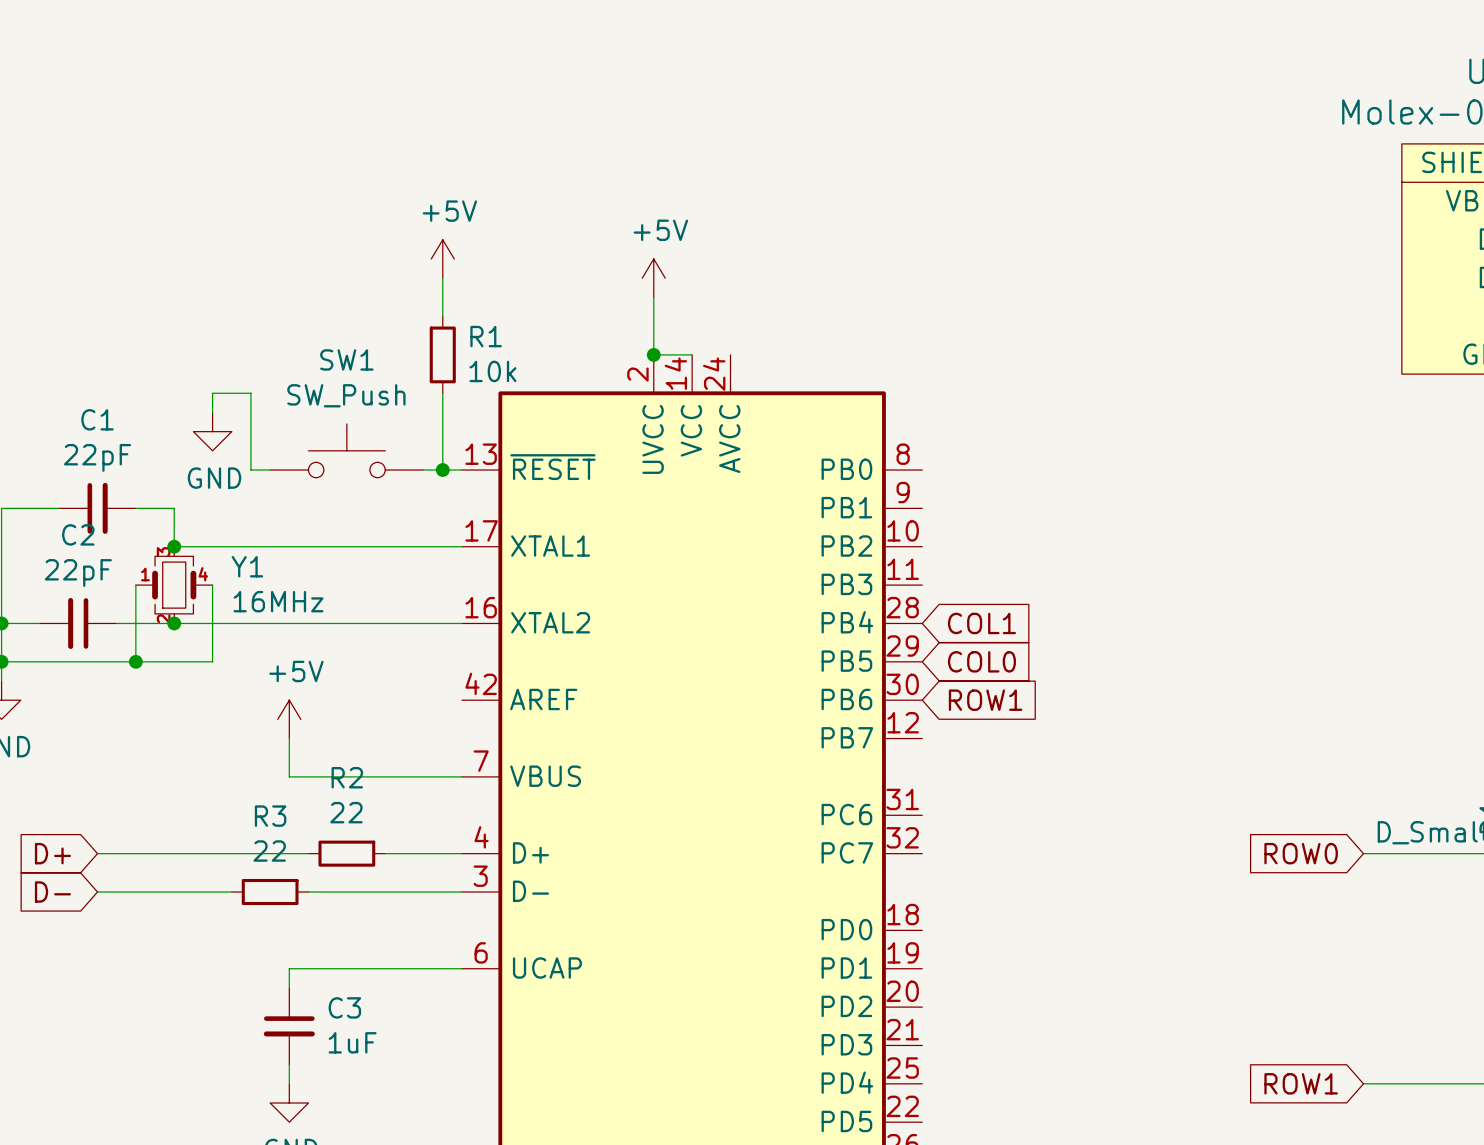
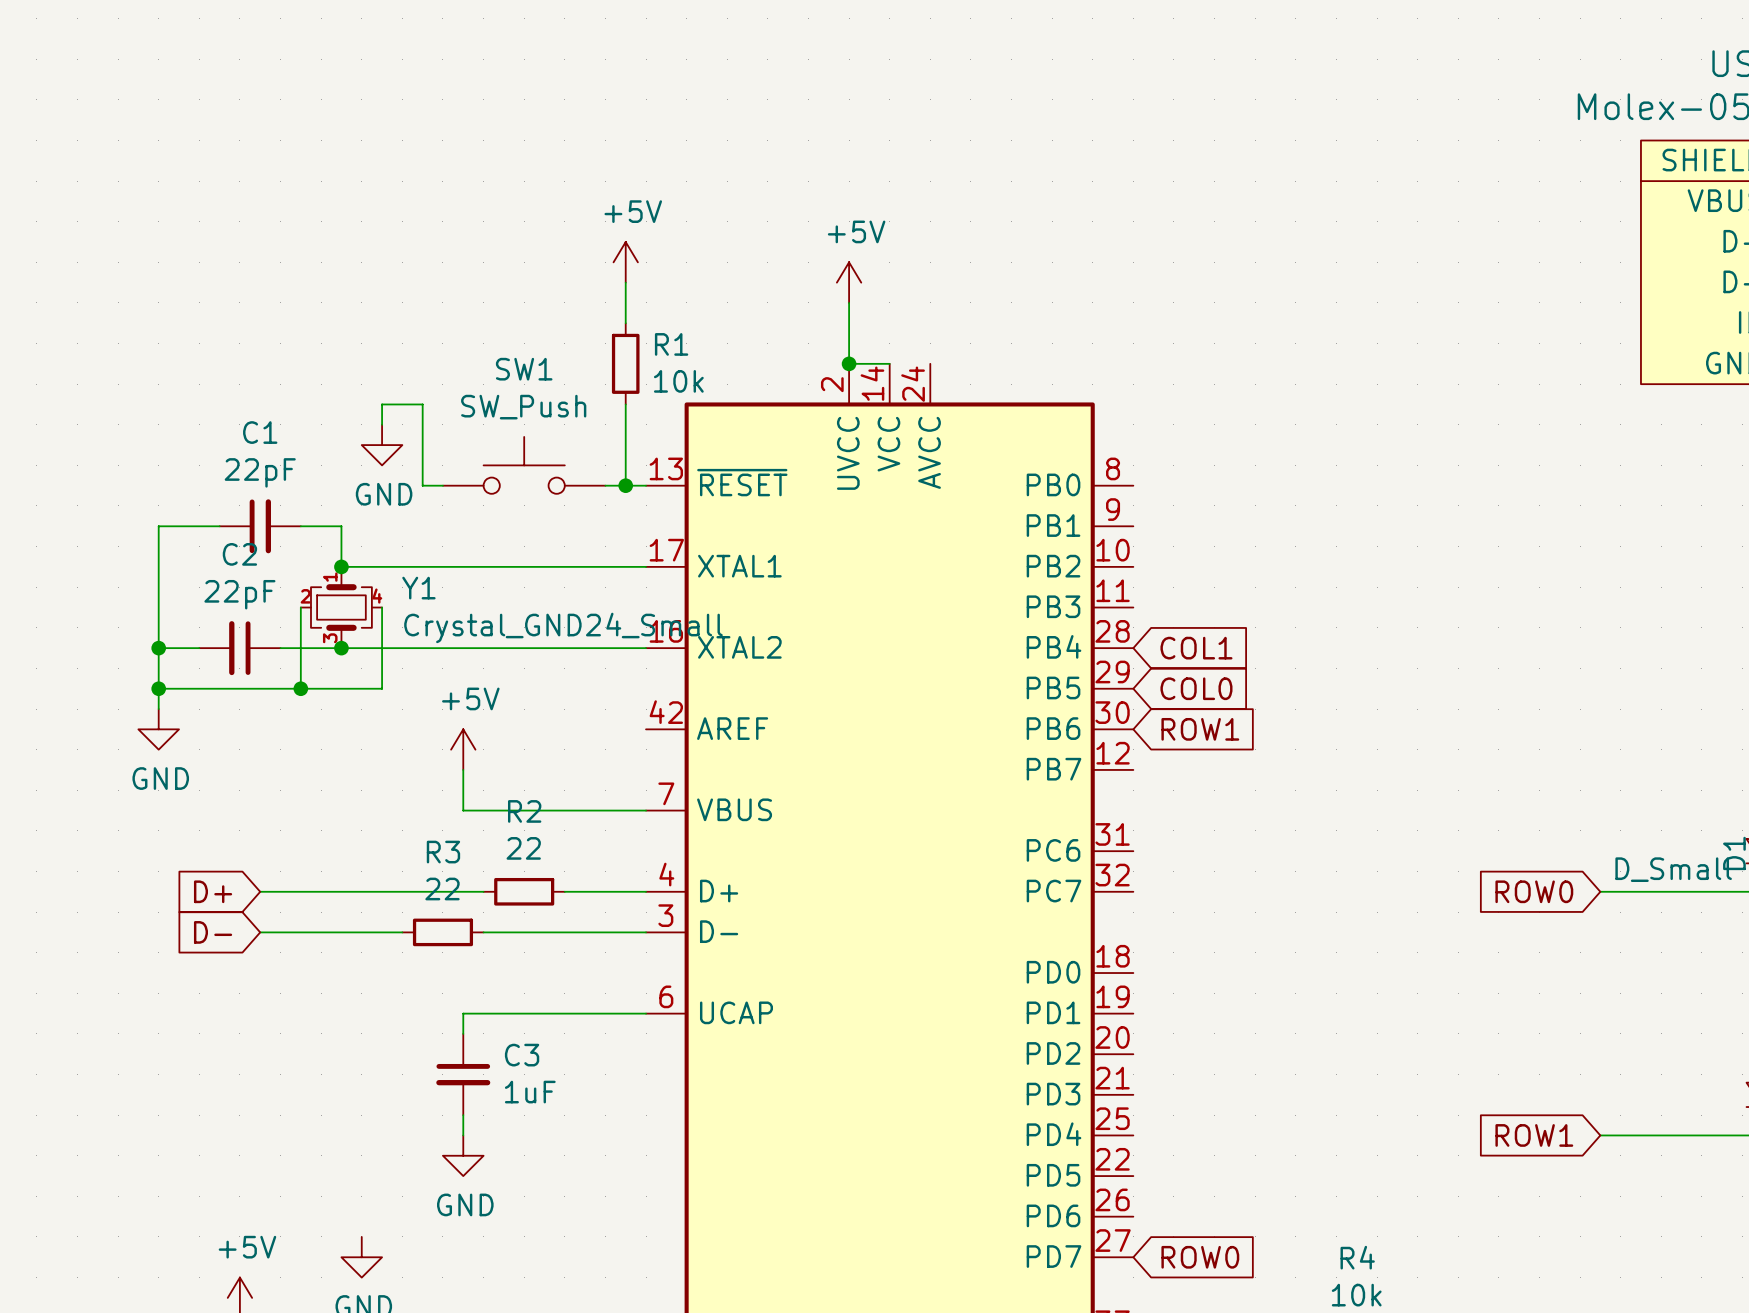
Y1 symbol: [135, 546, 213, 624] -> [300, 566, 383, 649]
Y1 value: 16MHz (278, 601) -> Crystal_GND24_Small (563, 627)

